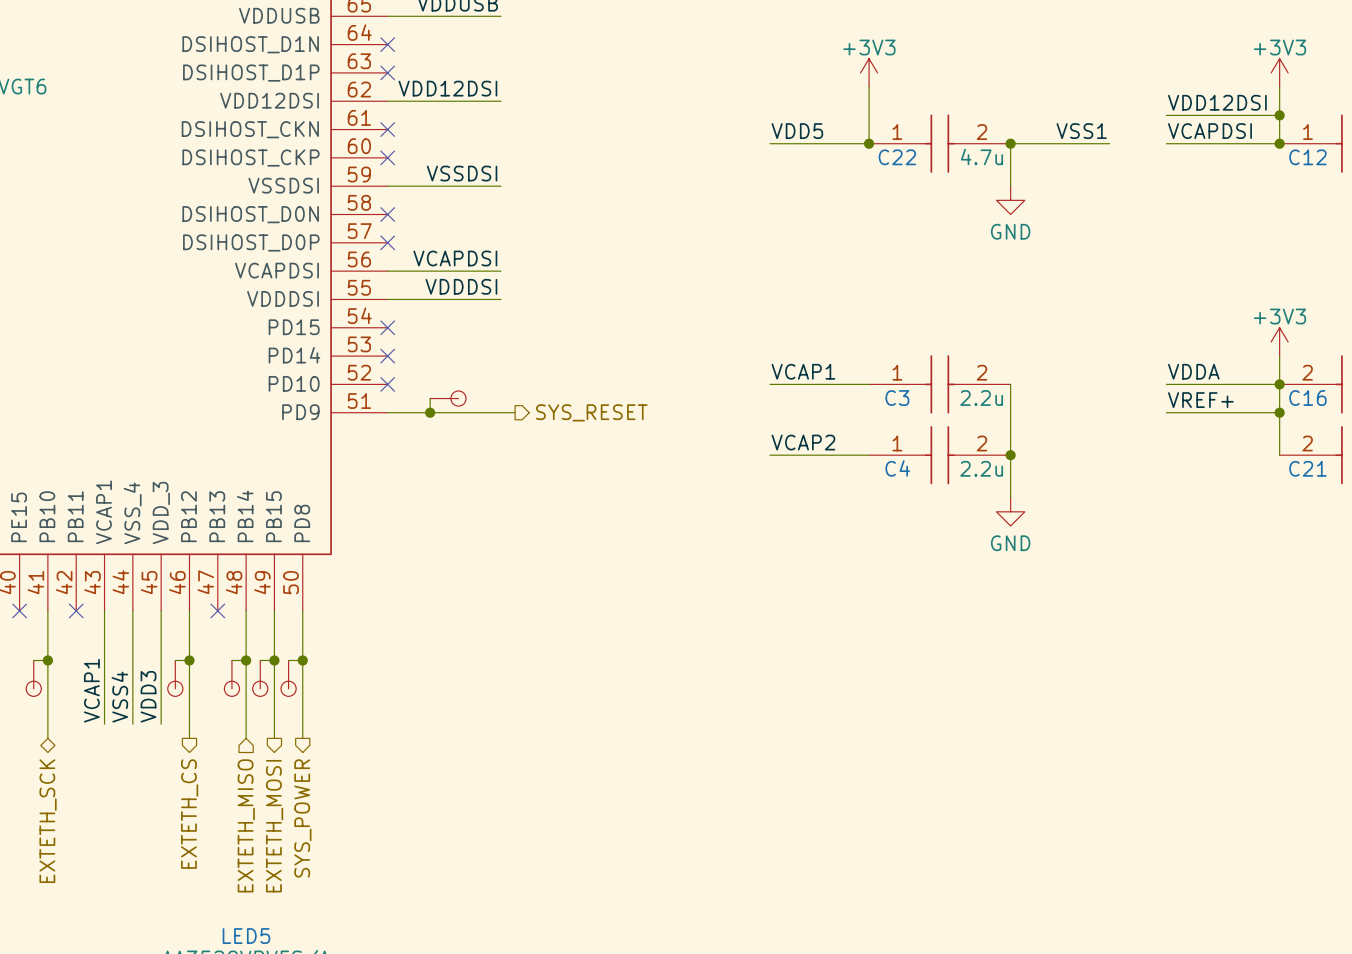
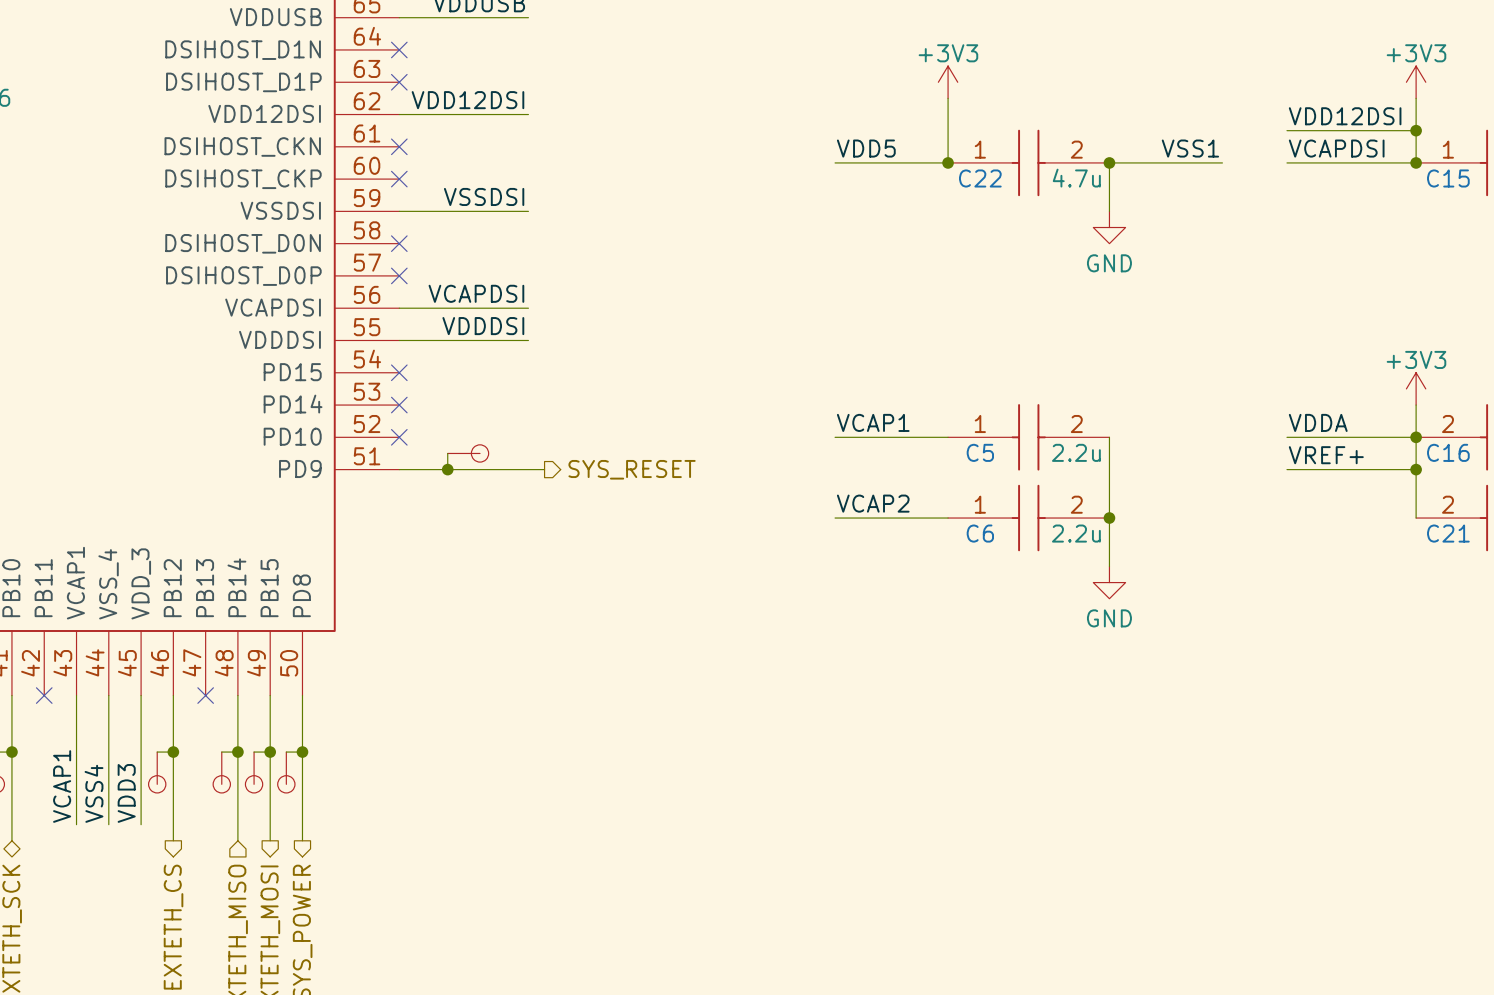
C12 name: C12 (1307, 157) -> C15 (1448, 178)
C3 name: C3 (897, 398) -> C5 (980, 452)
C4 name: C4 (897, 468) -> C6 (980, 533)

